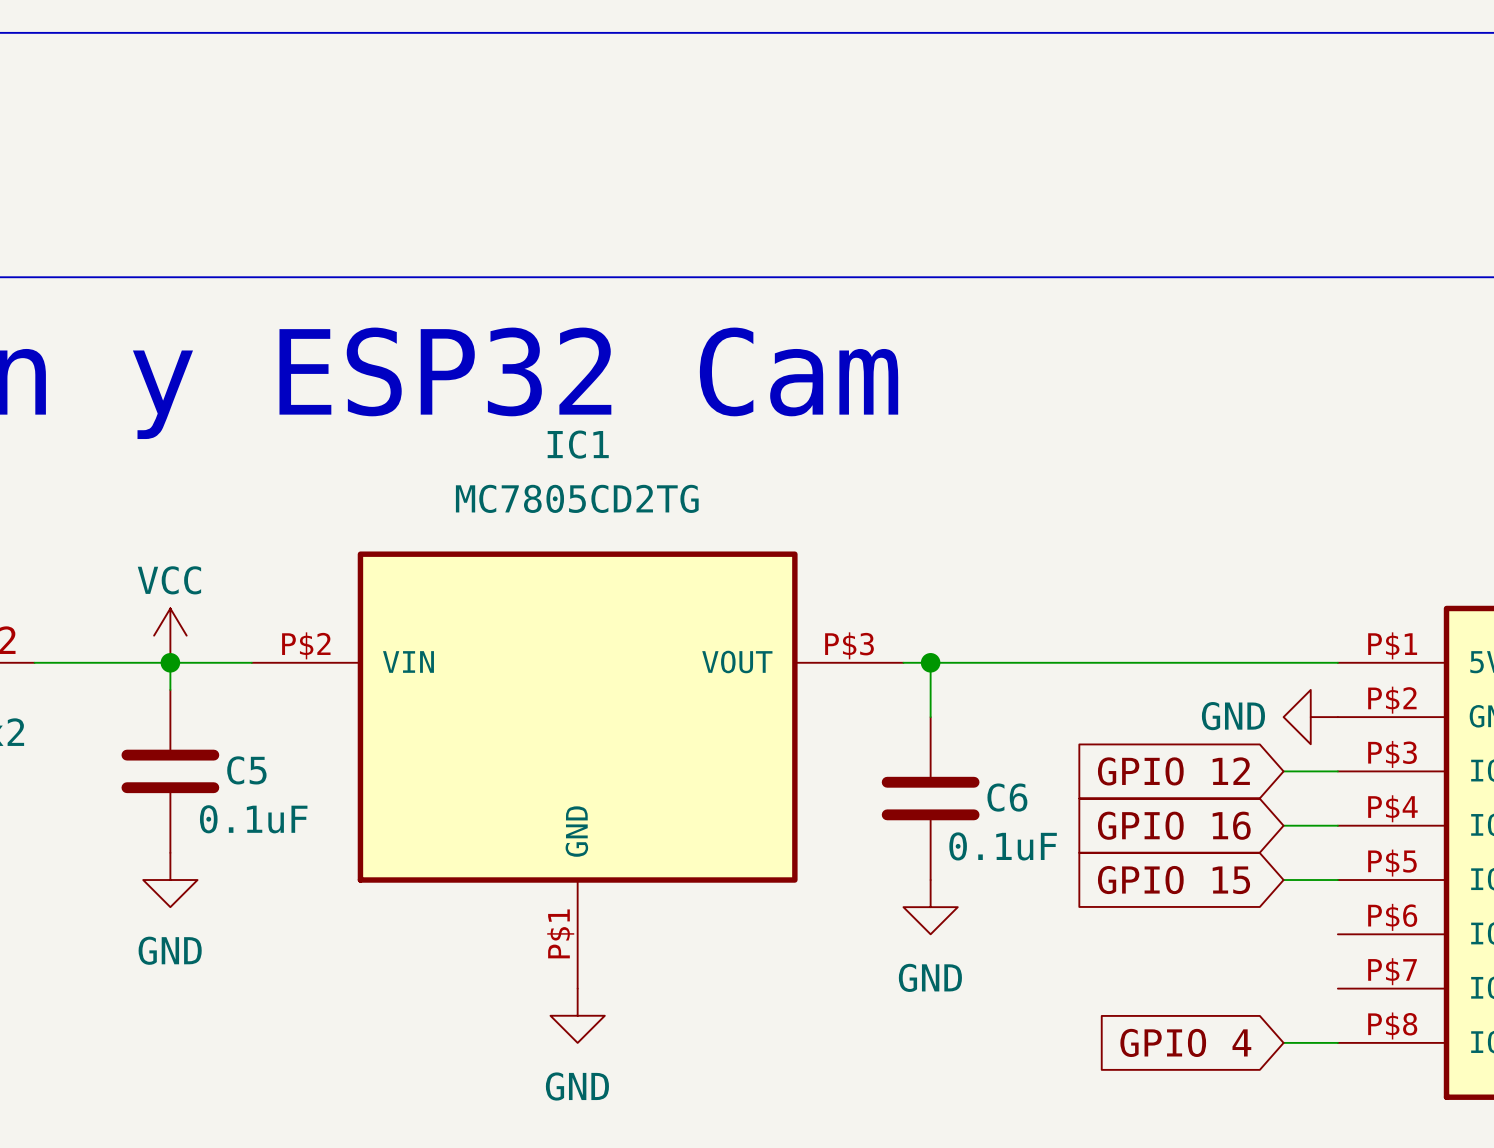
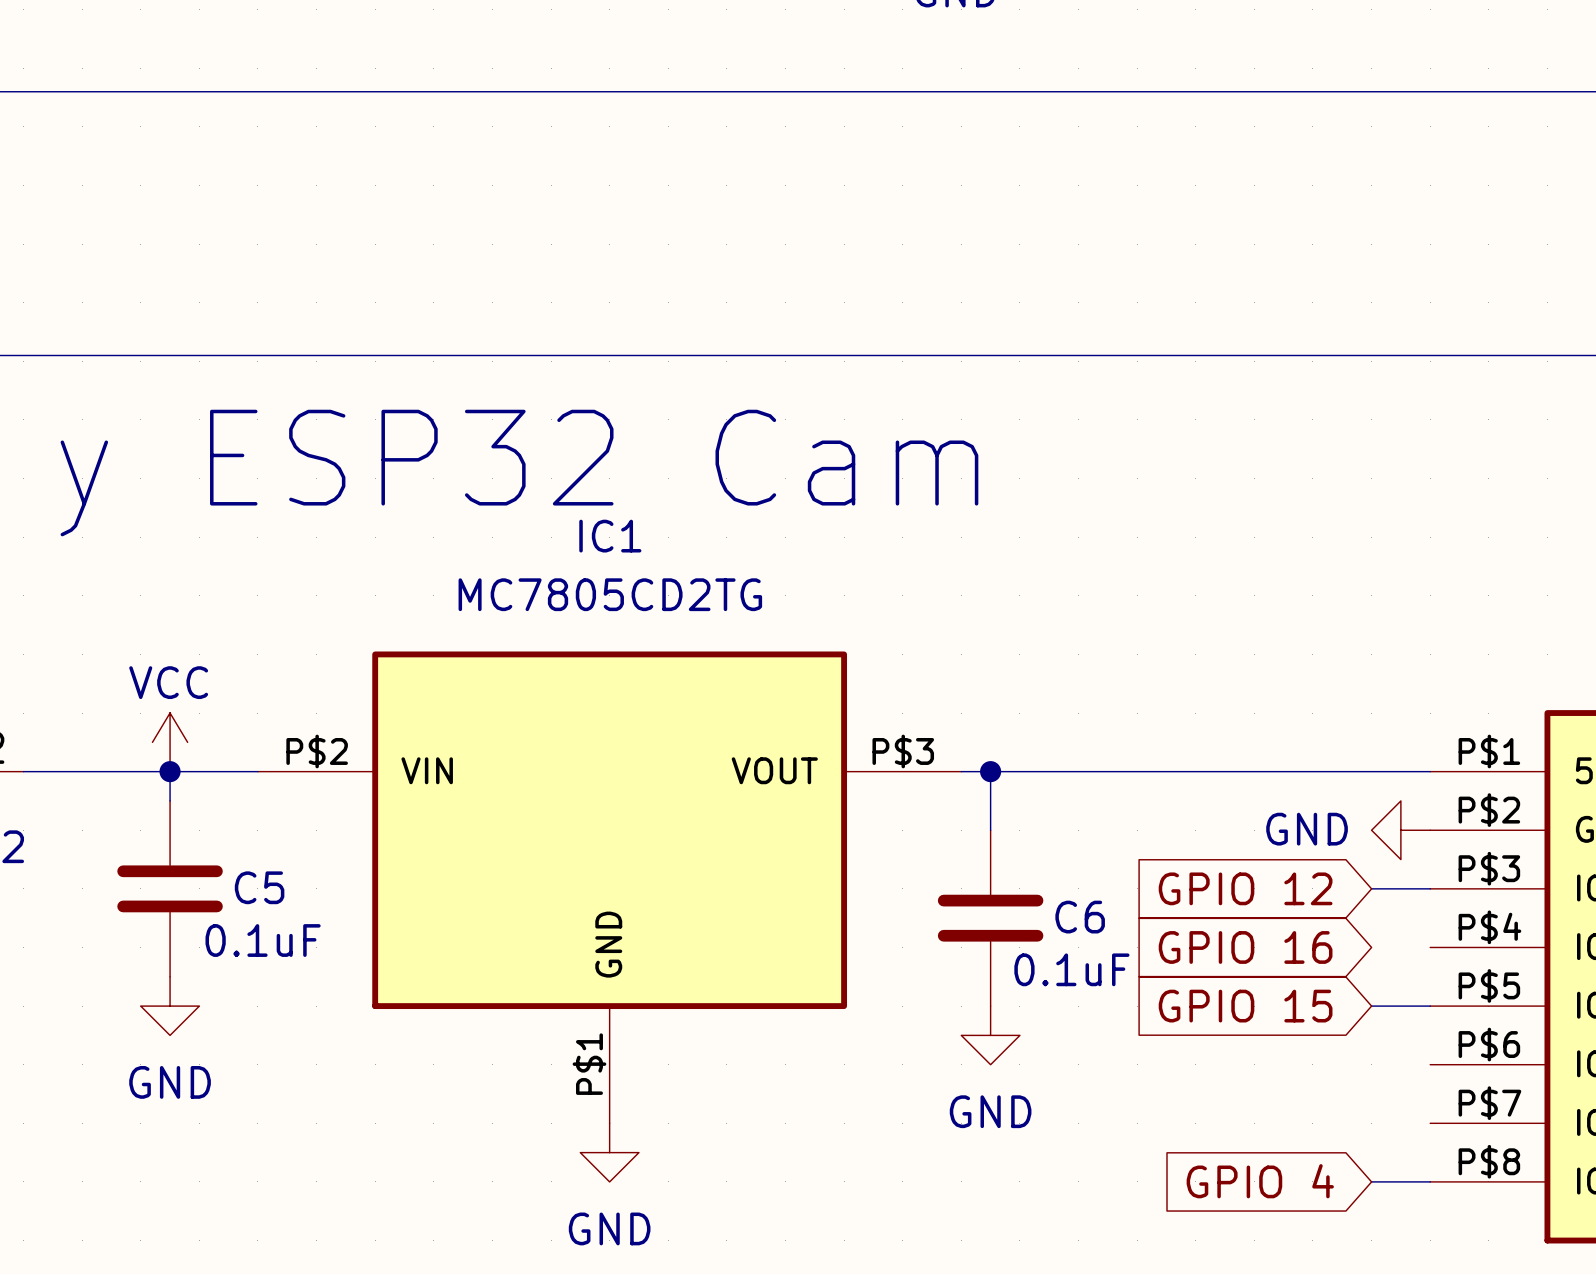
wire: (1283, 825) (1337, 825) -> none

